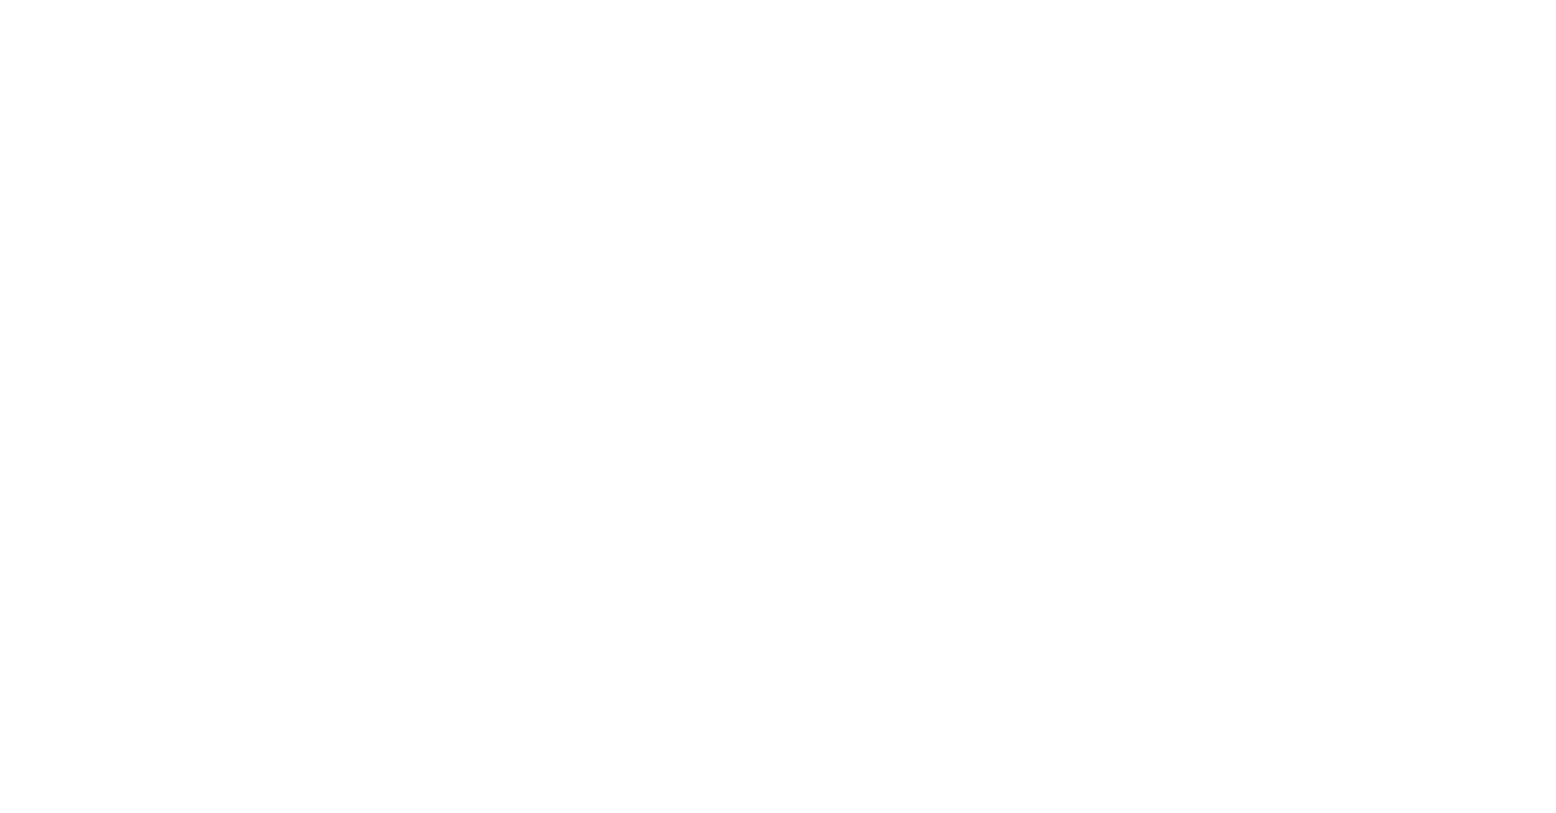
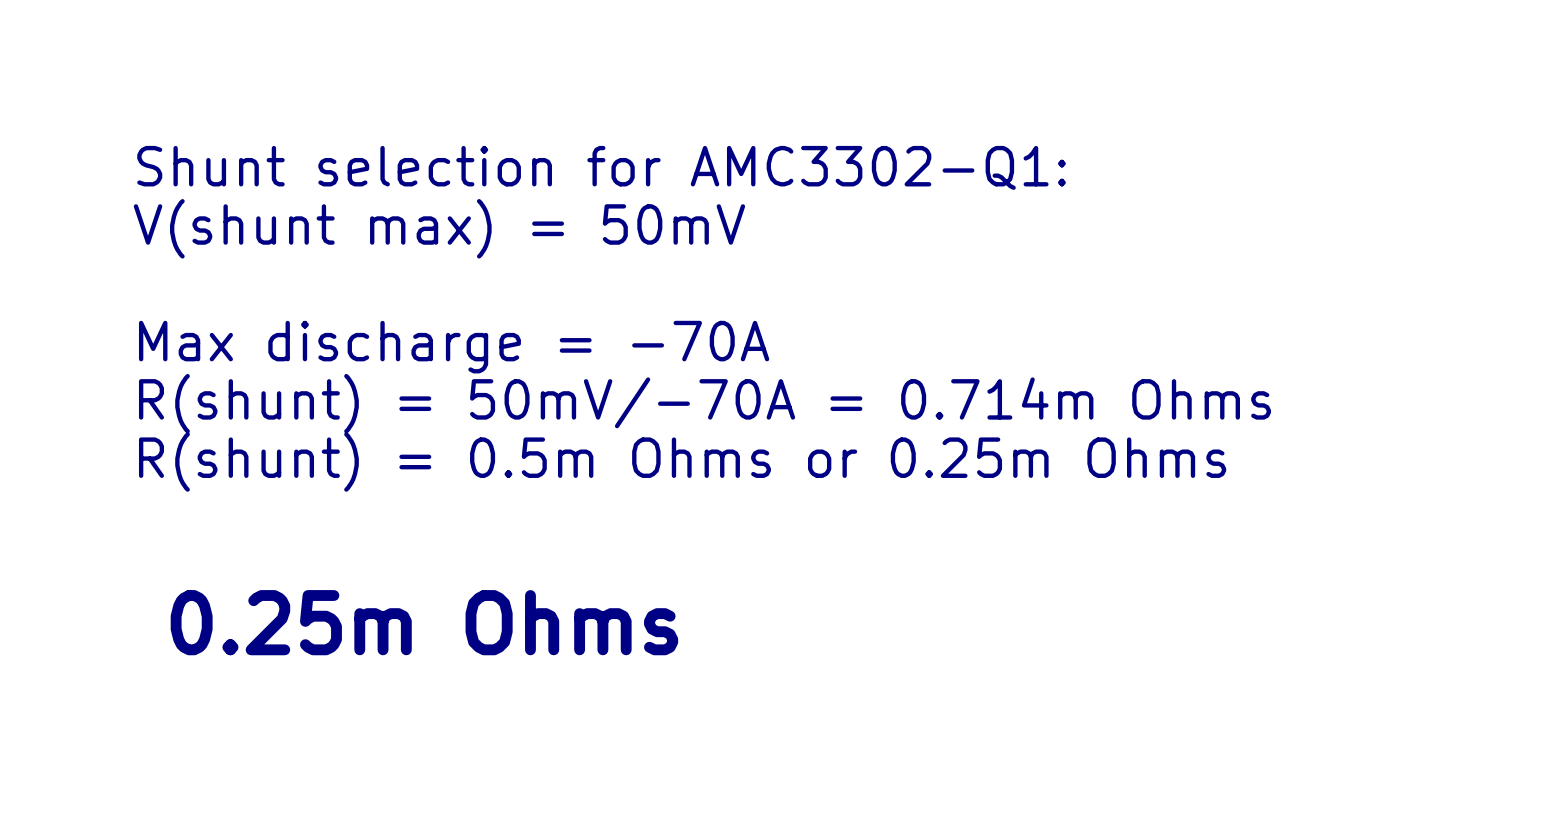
text: none -> Shunt selection for AMC3302-Q1: (601, 167)
text: none -> V(shunt max) = 50mV (439, 228)
text: none -> Max discharge = -70A (454, 347)
text: none -> R(shunt) = 50mV/-70A = 0.714m Ohms (705, 403)
text: none -> R(shunt) = 0.5m Ohms or 0.25m Ohms (682, 461)
text: none -> 0.25m Ohms (424, 622)

